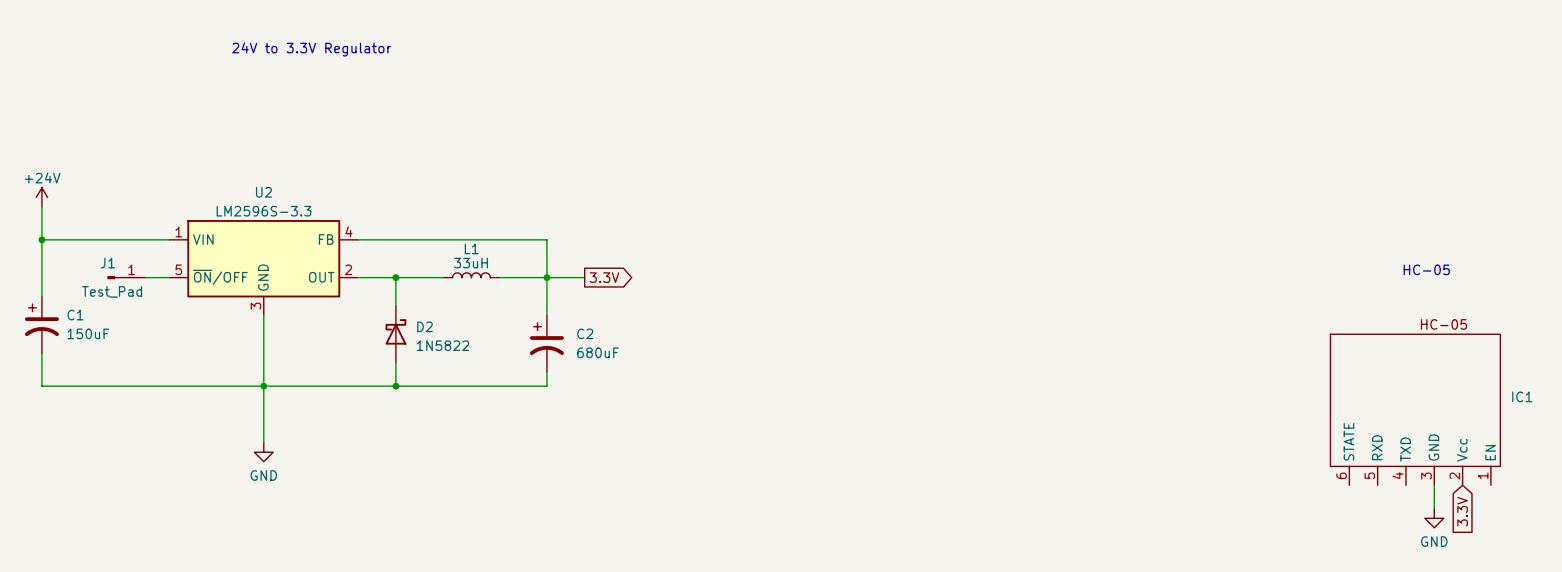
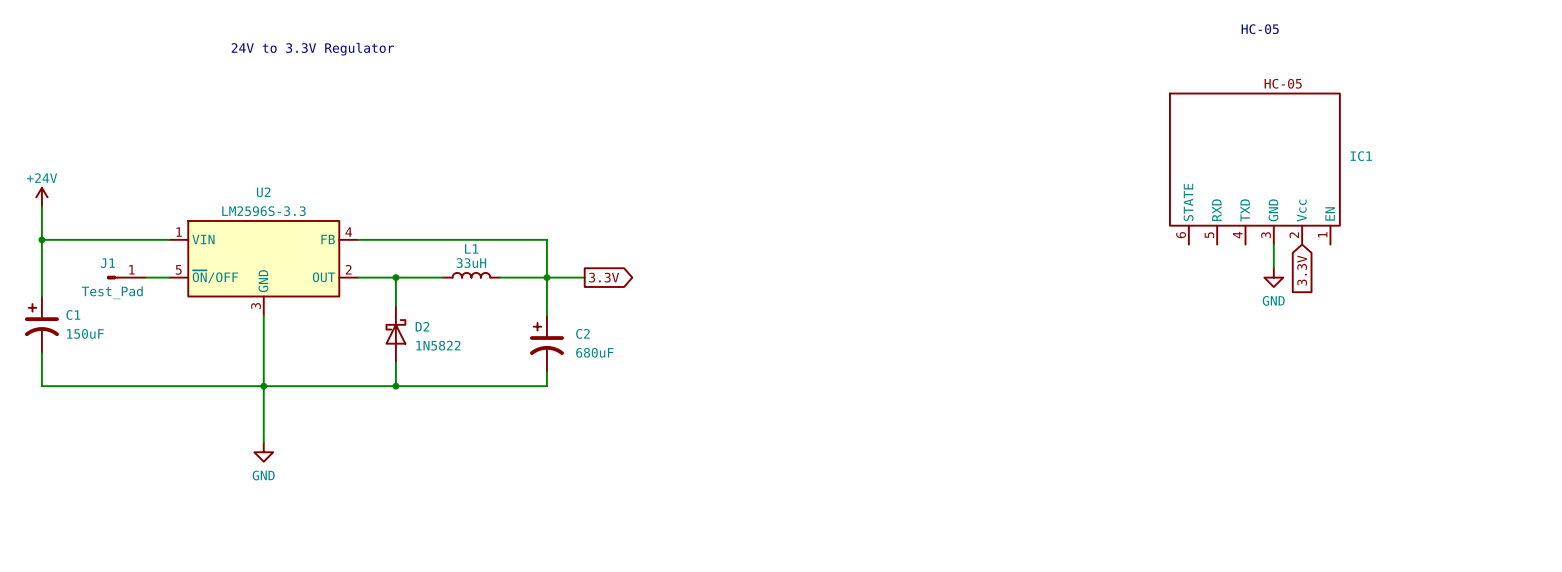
text: none -> HC-05 (1260, 29)
wire: none -> (1273, 244) (1273, 268)
text: HC-05 (1426, 269) -> none
global label: none -> 3.3V (1302, 270)
power symbol: none -> GND (1273, 277)
IC1 position: (1415, 409) -> (1254, 169)
wire: (1434, 485) (1434, 508) -> none
global label: 3.3V (1462, 511) -> none
power symbol: GND (1434, 518) -> none

